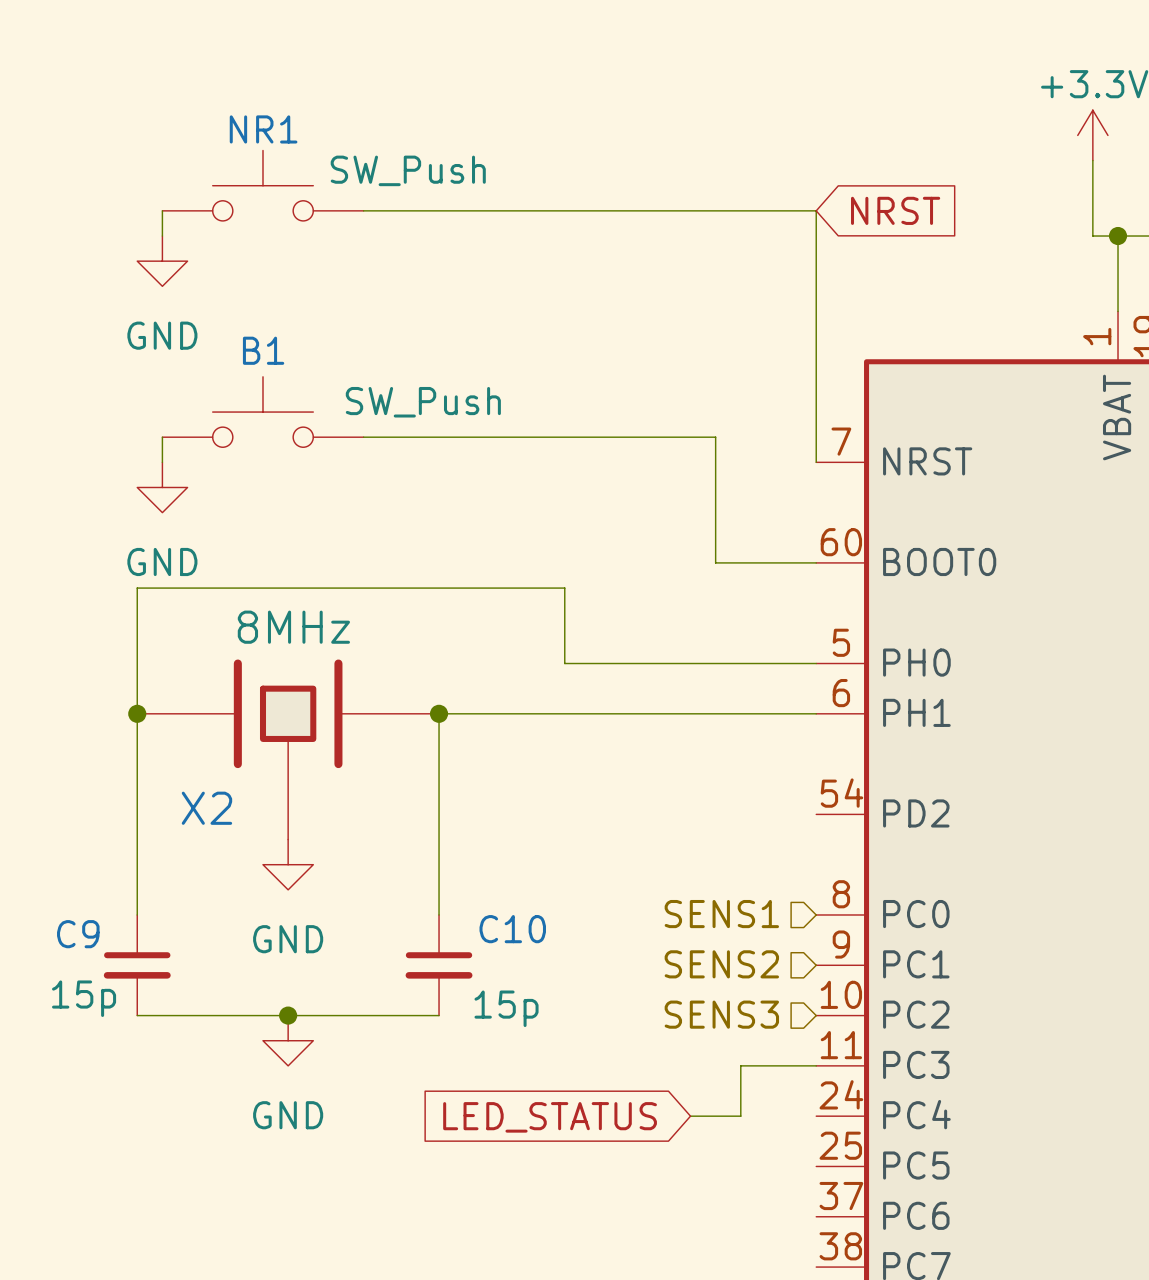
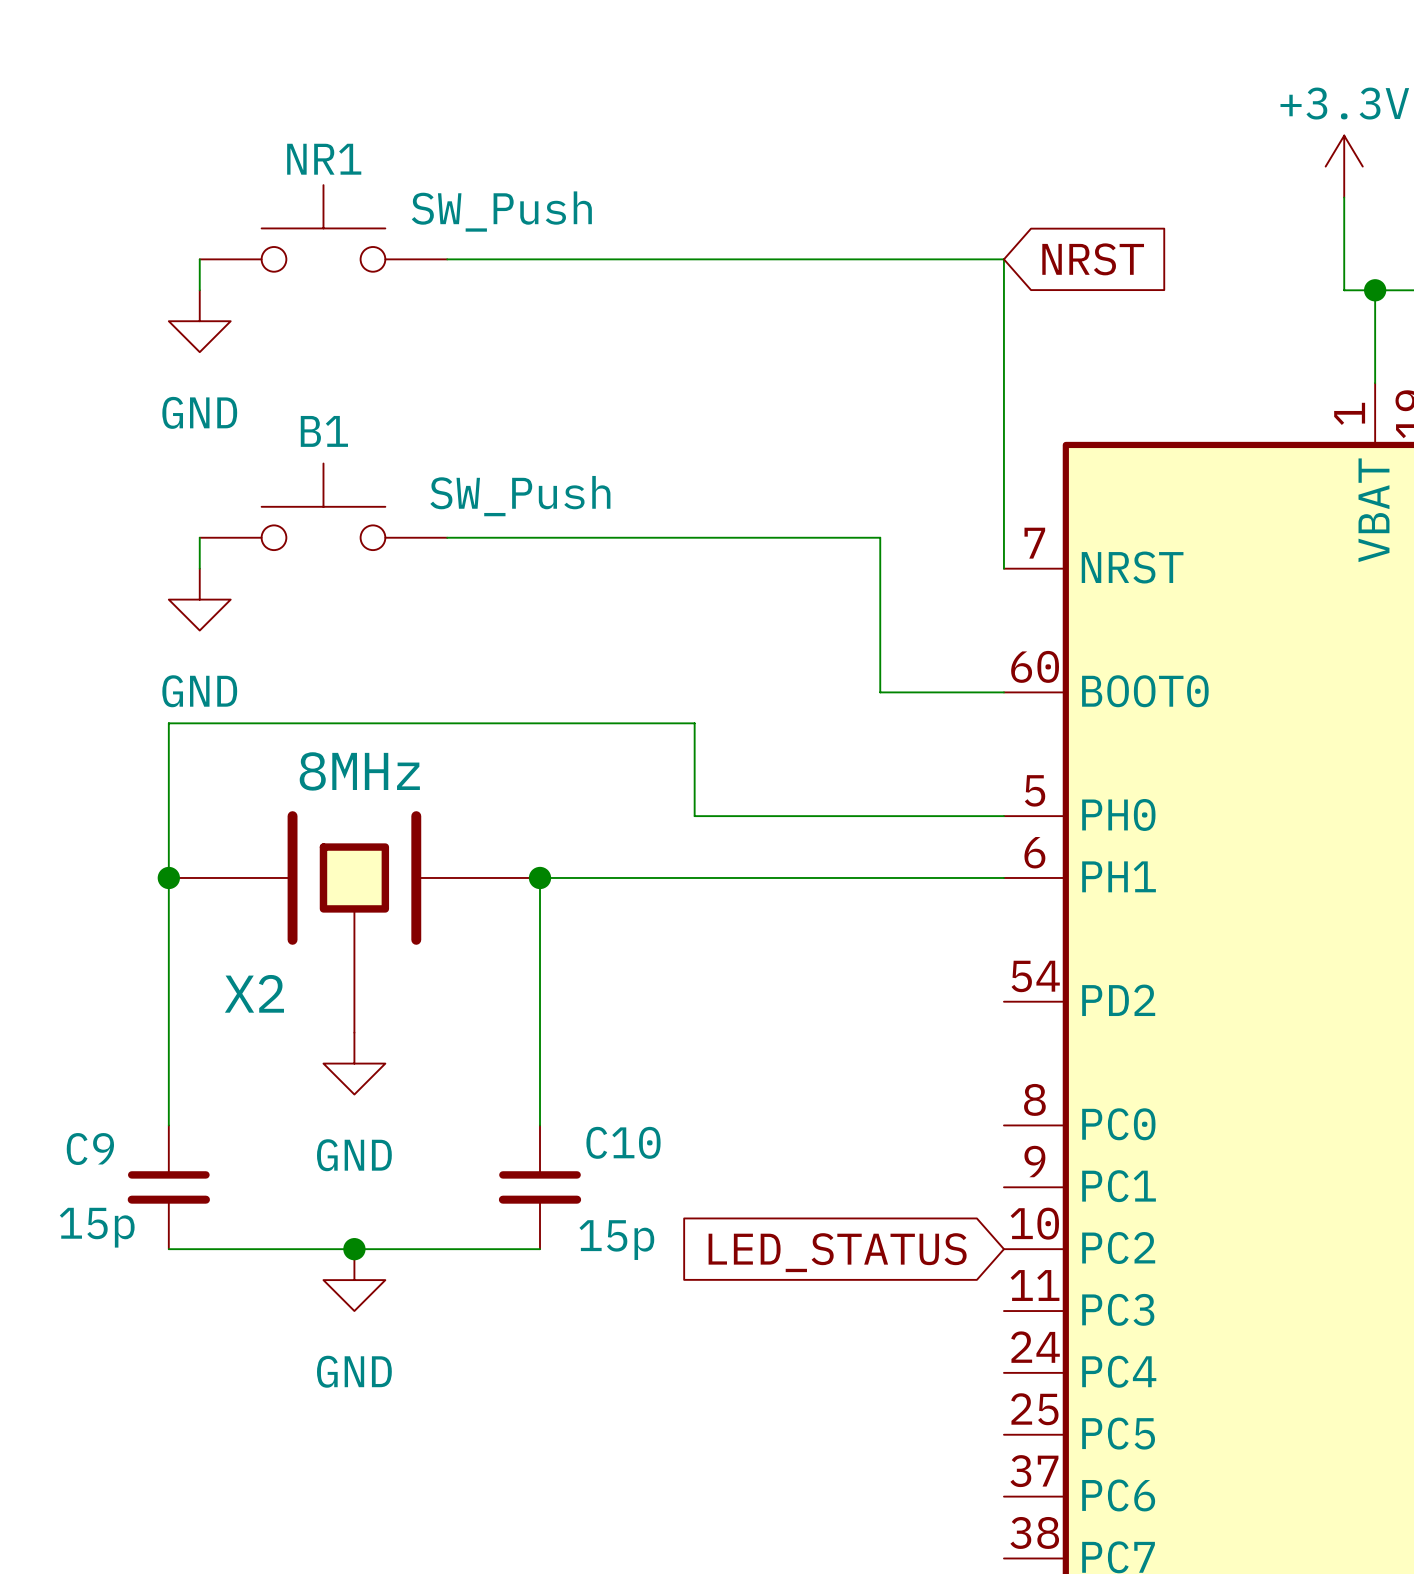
hierarchical label: SENS1 (721, 914) -> none
hierarchical label: SENS2 (721, 964) -> none
hierarchical label: SENS3 (721, 1014) -> none
wire: (816, 1065) (740, 1065) (740, 1116) (690, 1116) -> none
global label position: LED_STATUS (550, 1117) -> LED_STATUS (837, 1252)

